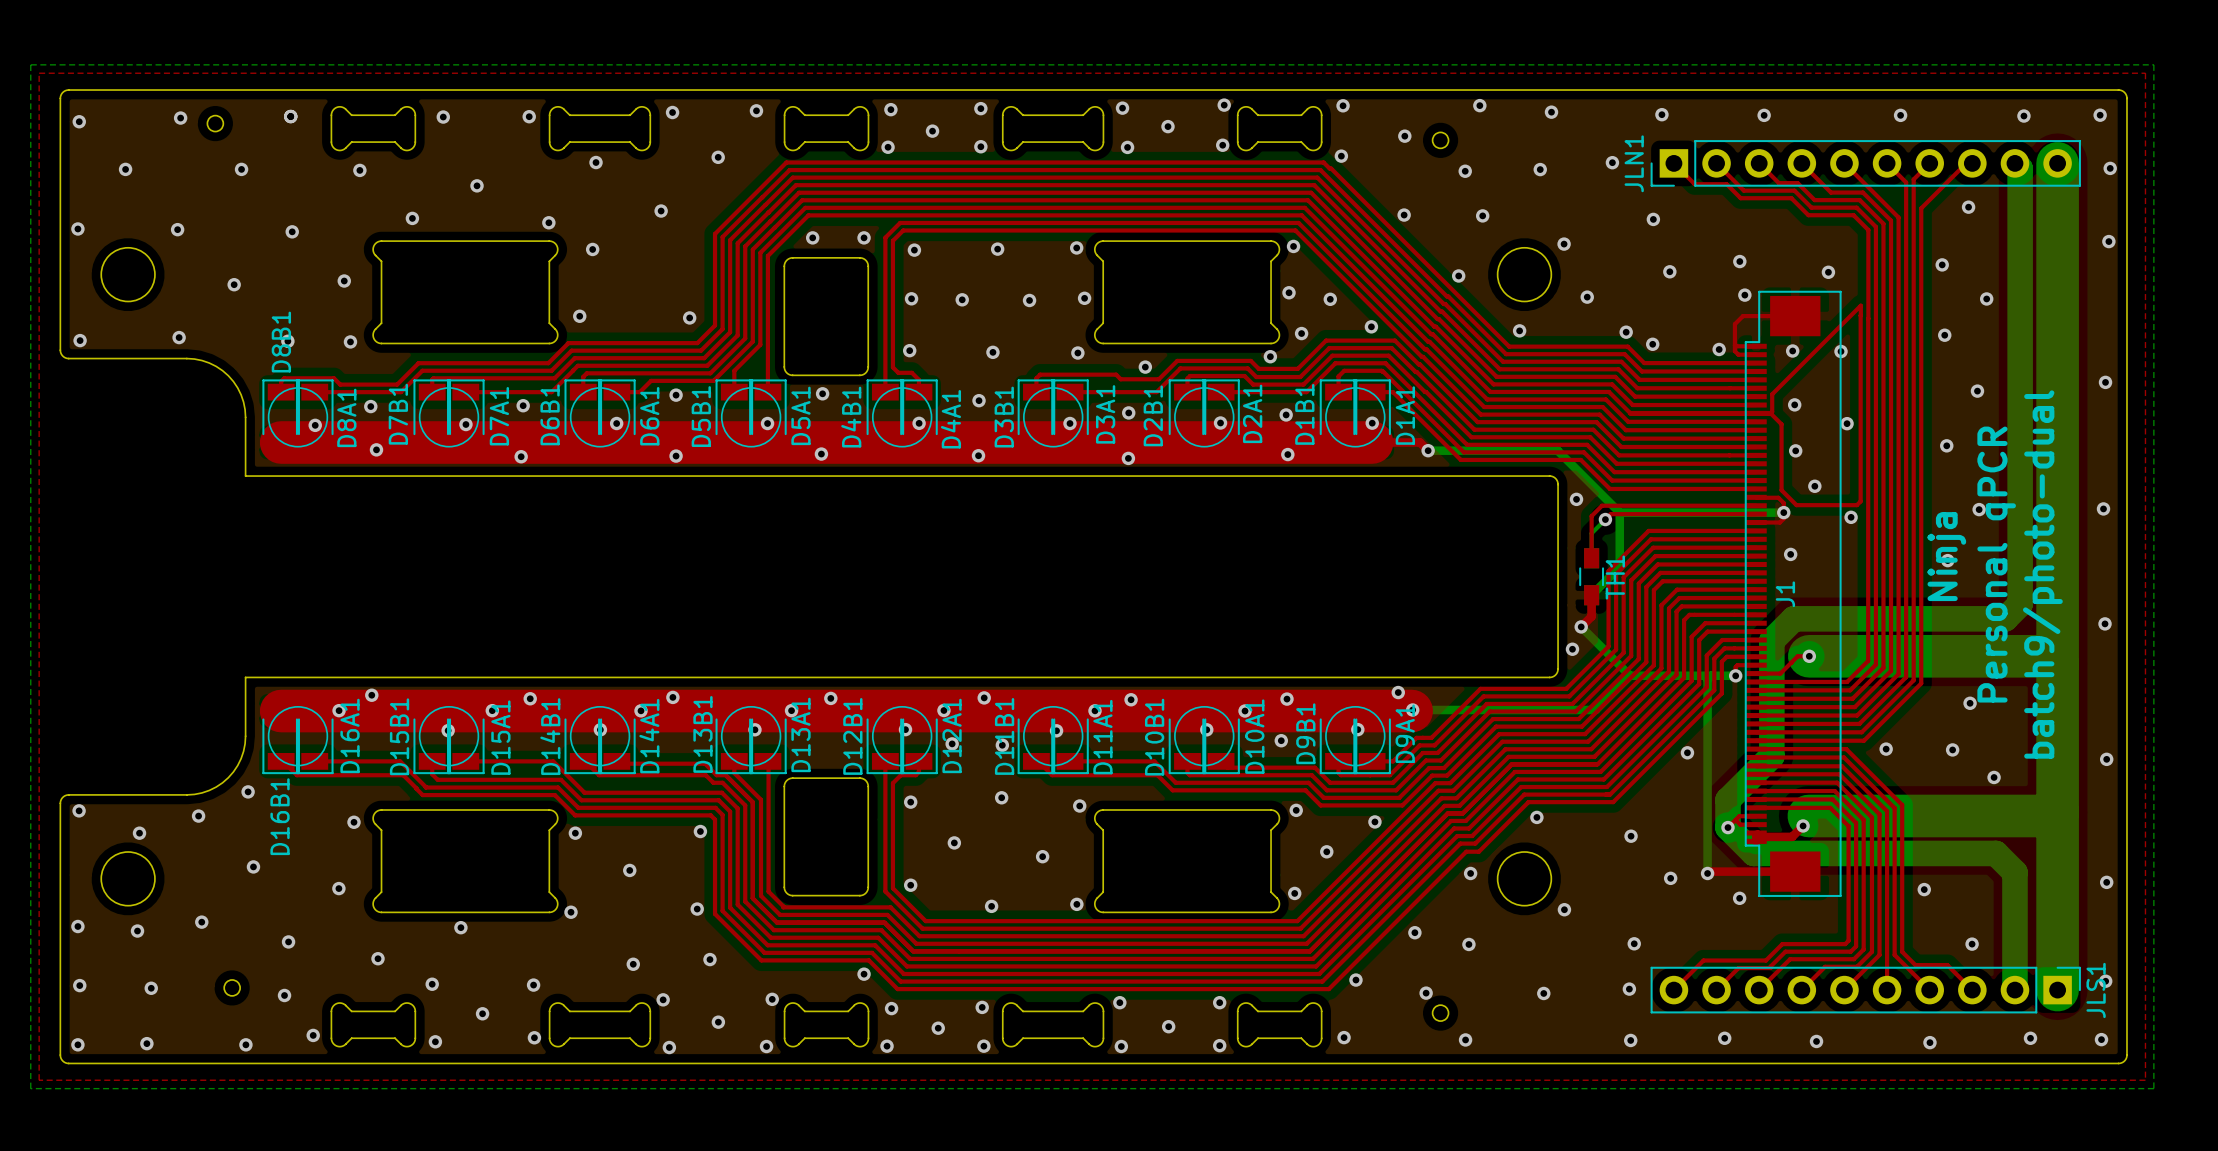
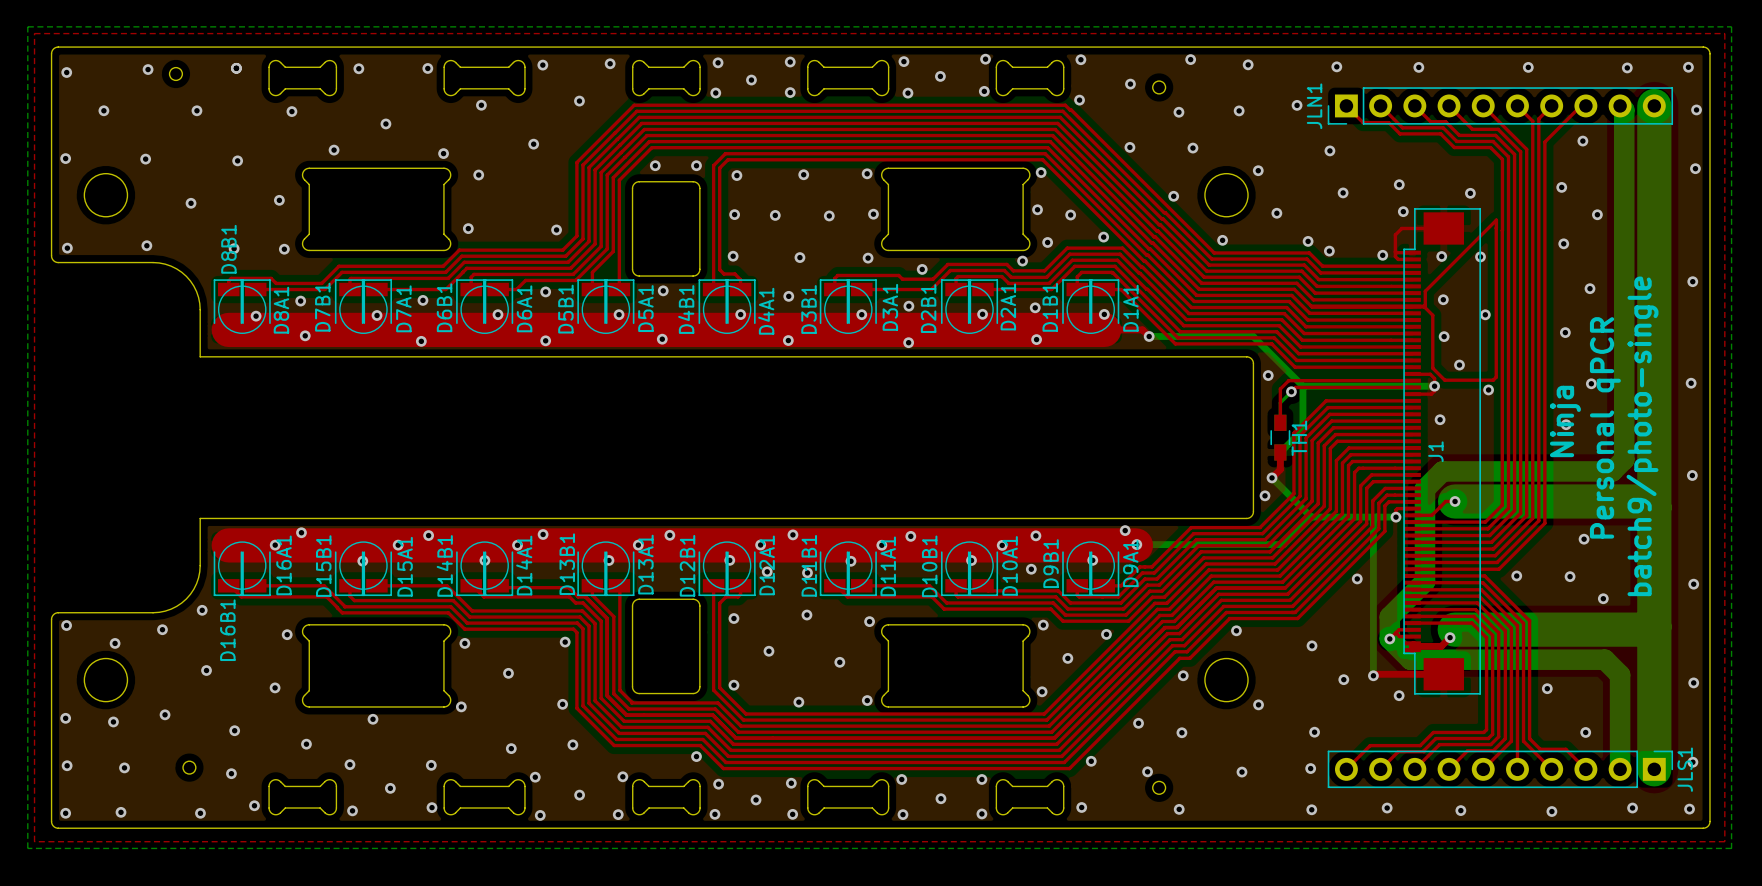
text: batch9/photo-dual (2042, 574) -> batch9/photo-single (1642, 436)

